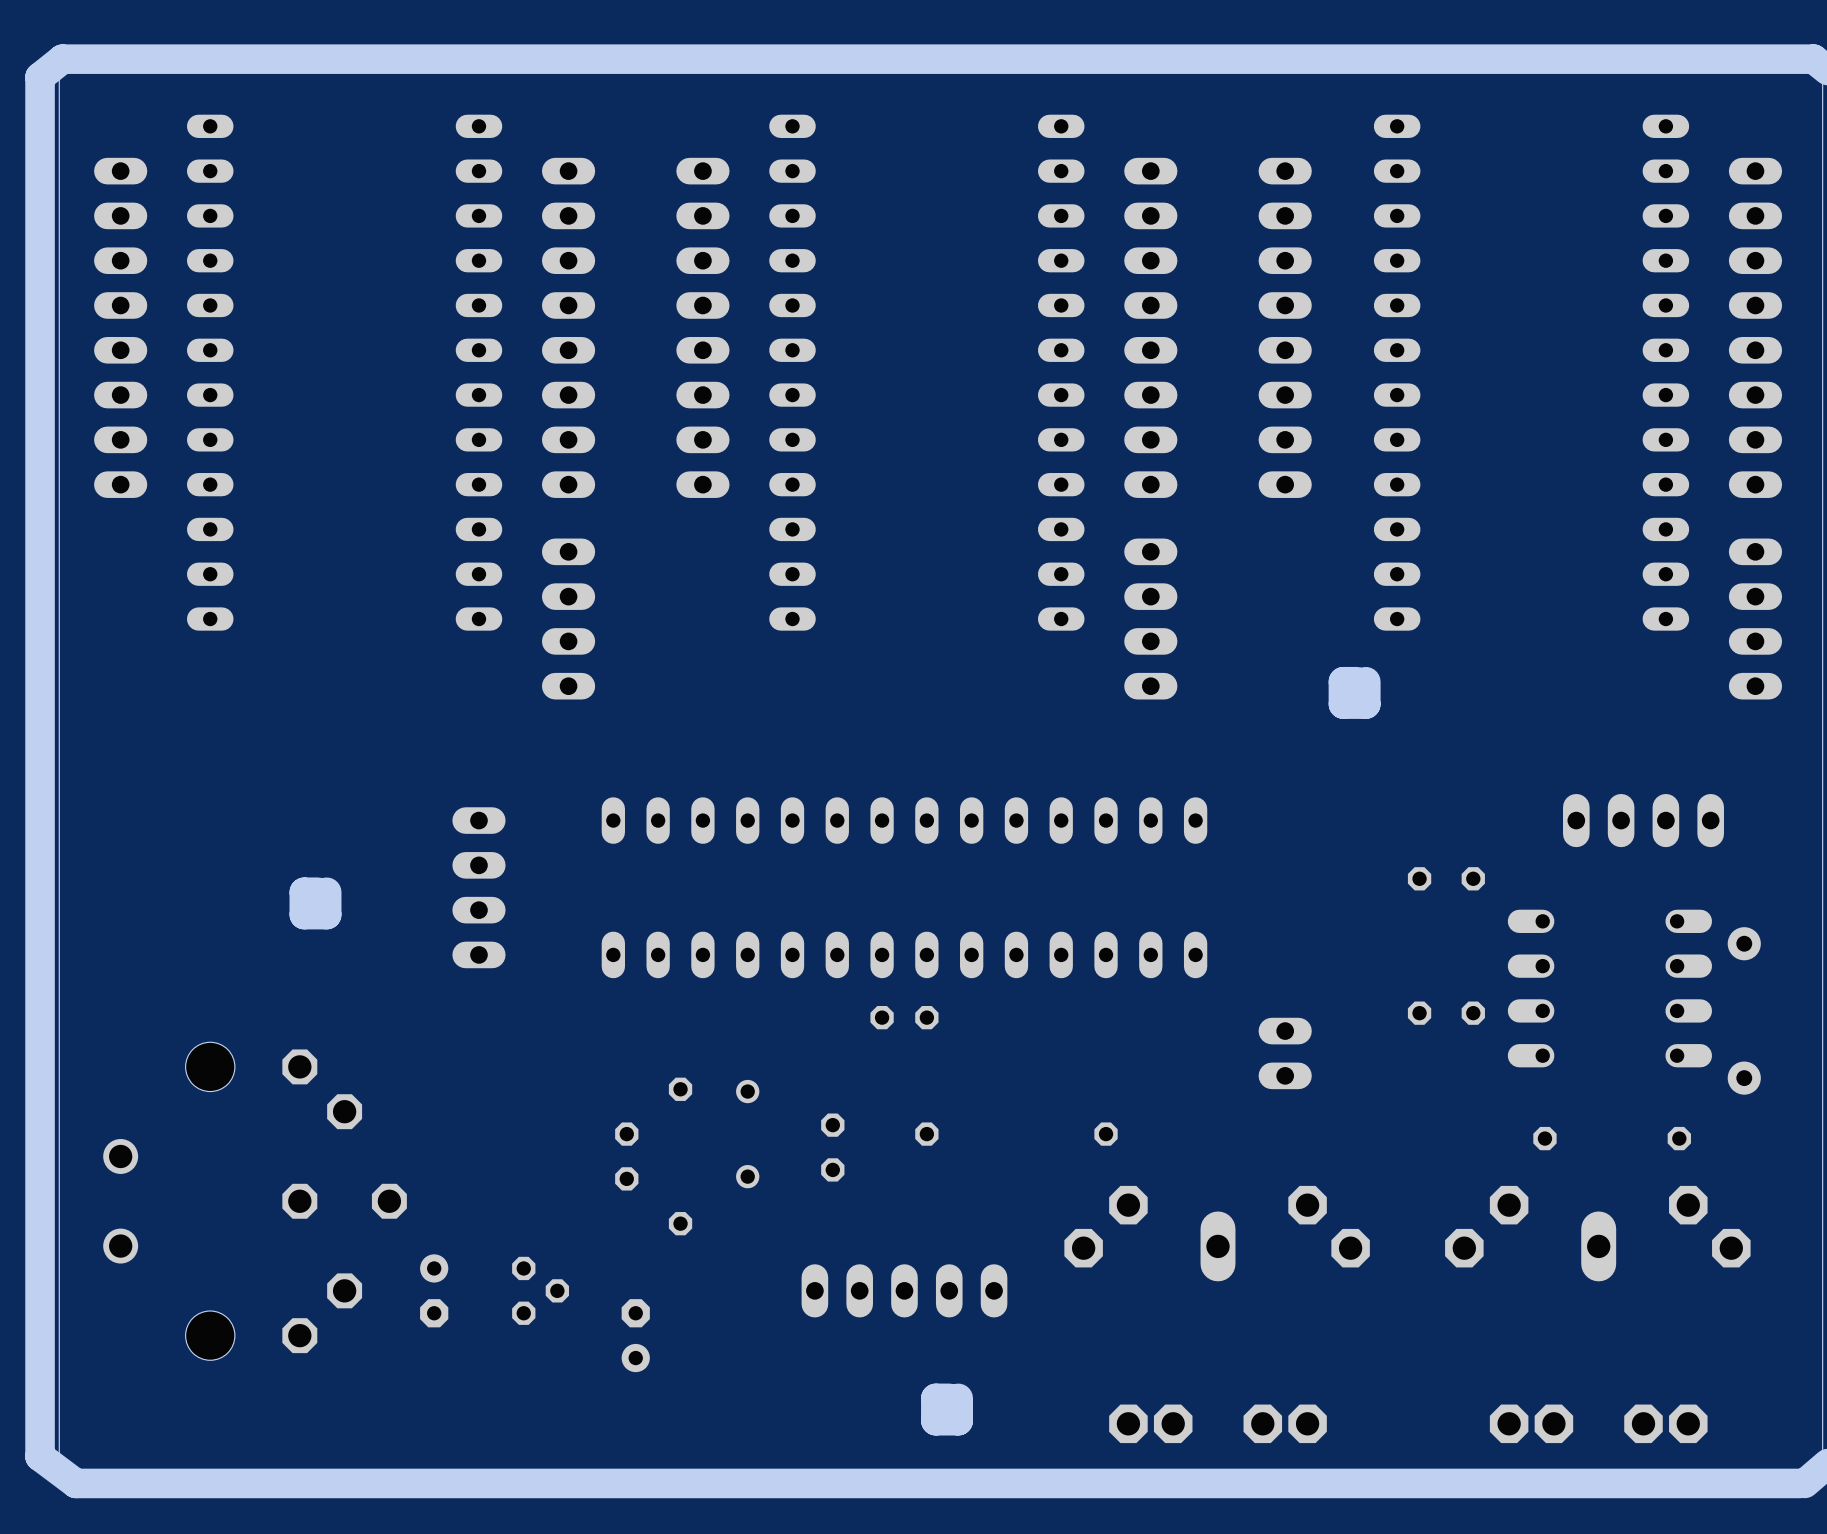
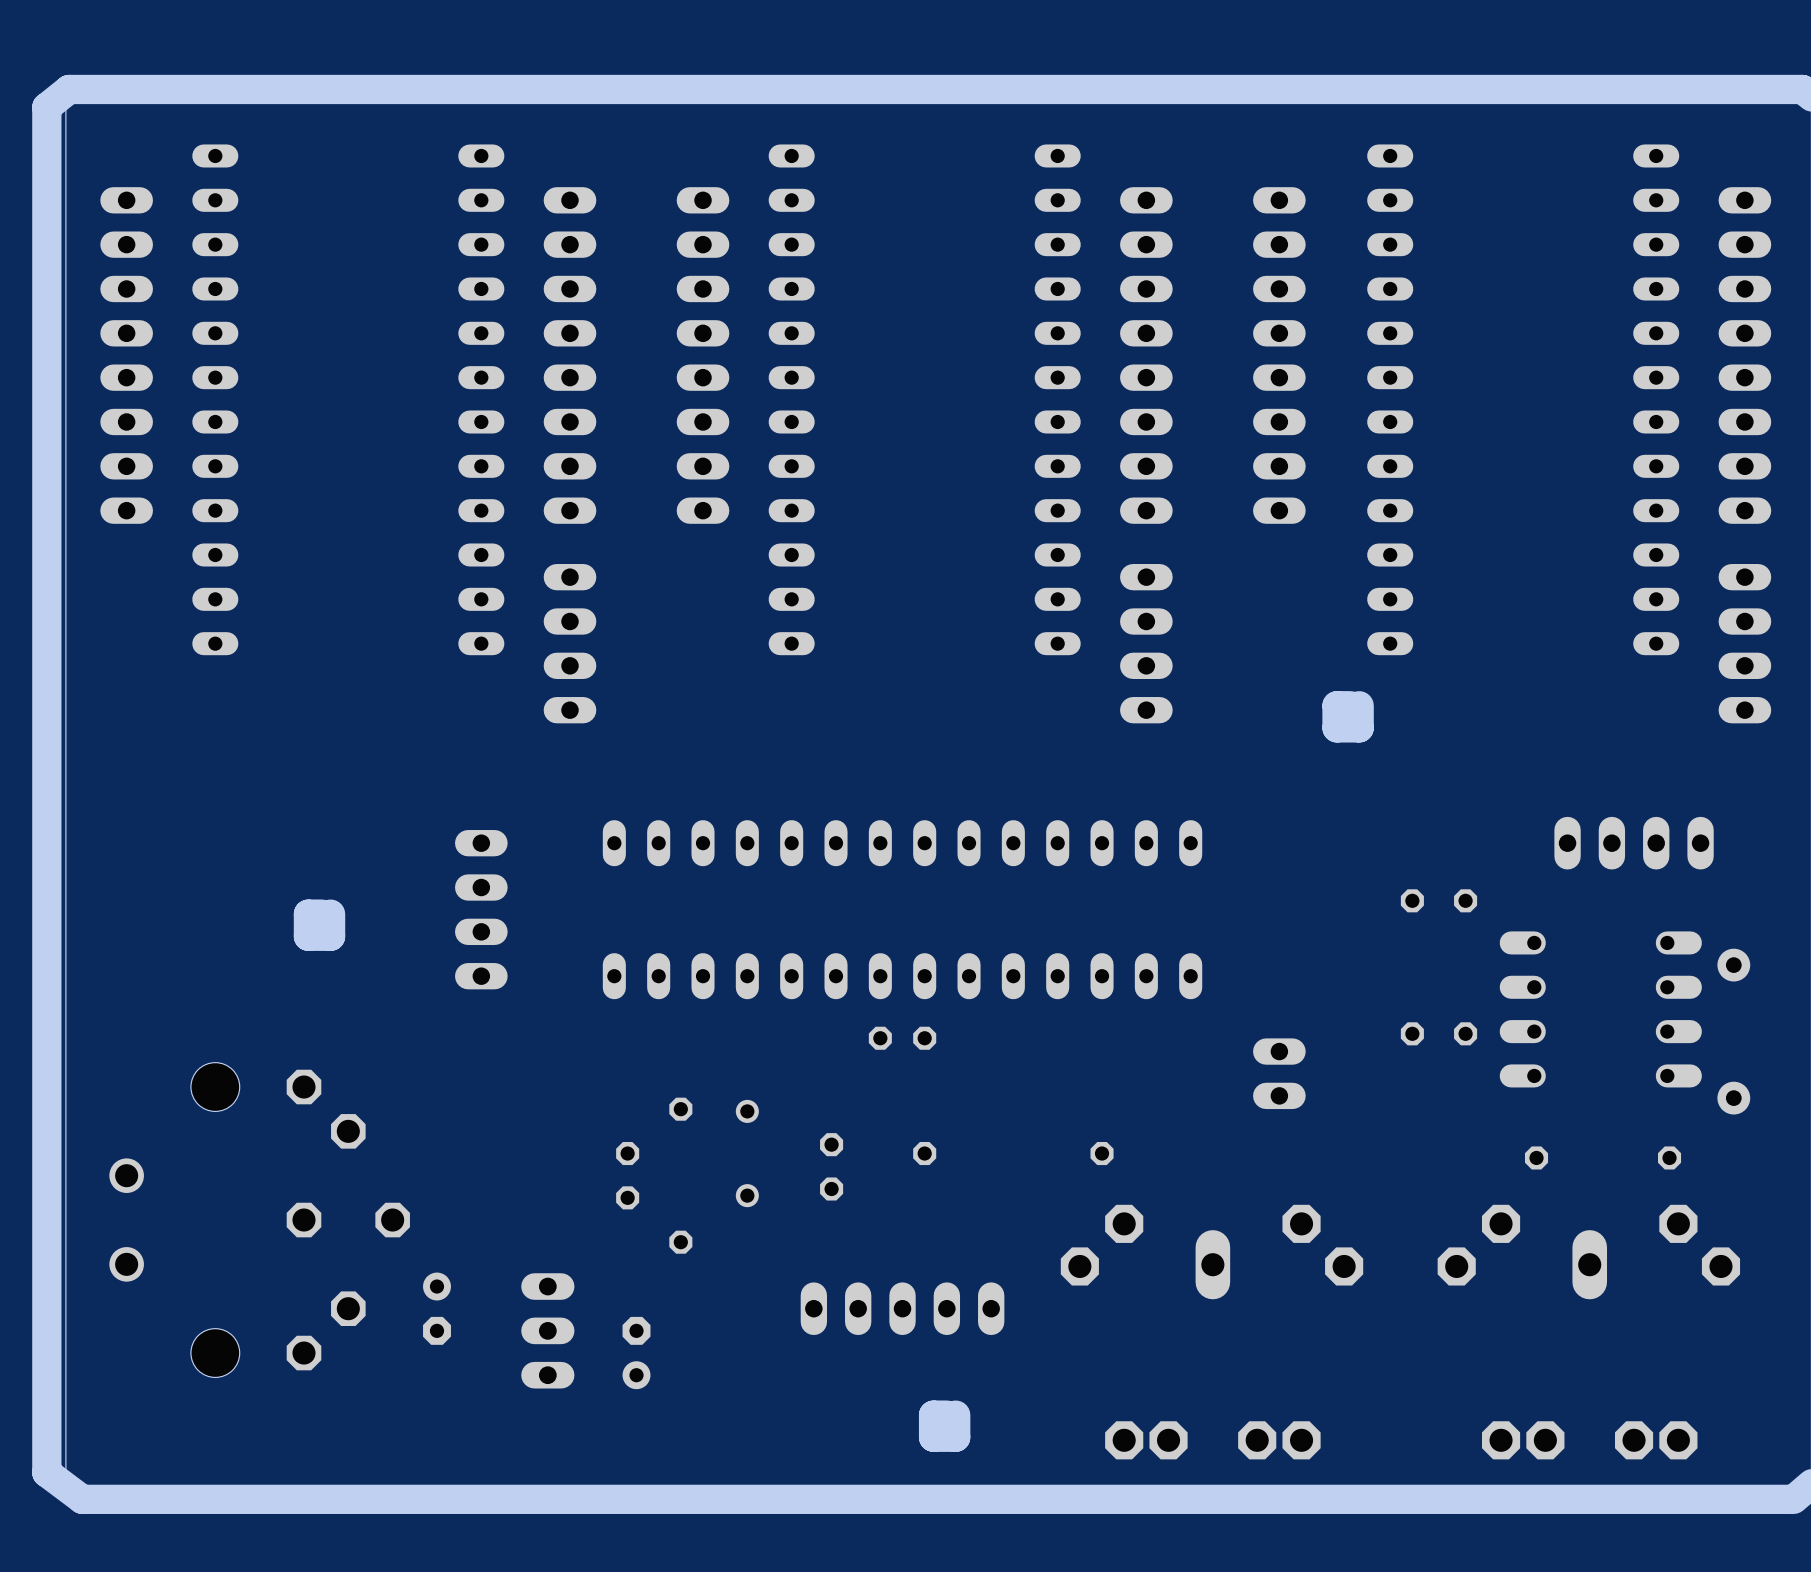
part: (540, 1290) -> none
part: none -> (547, 1330)

